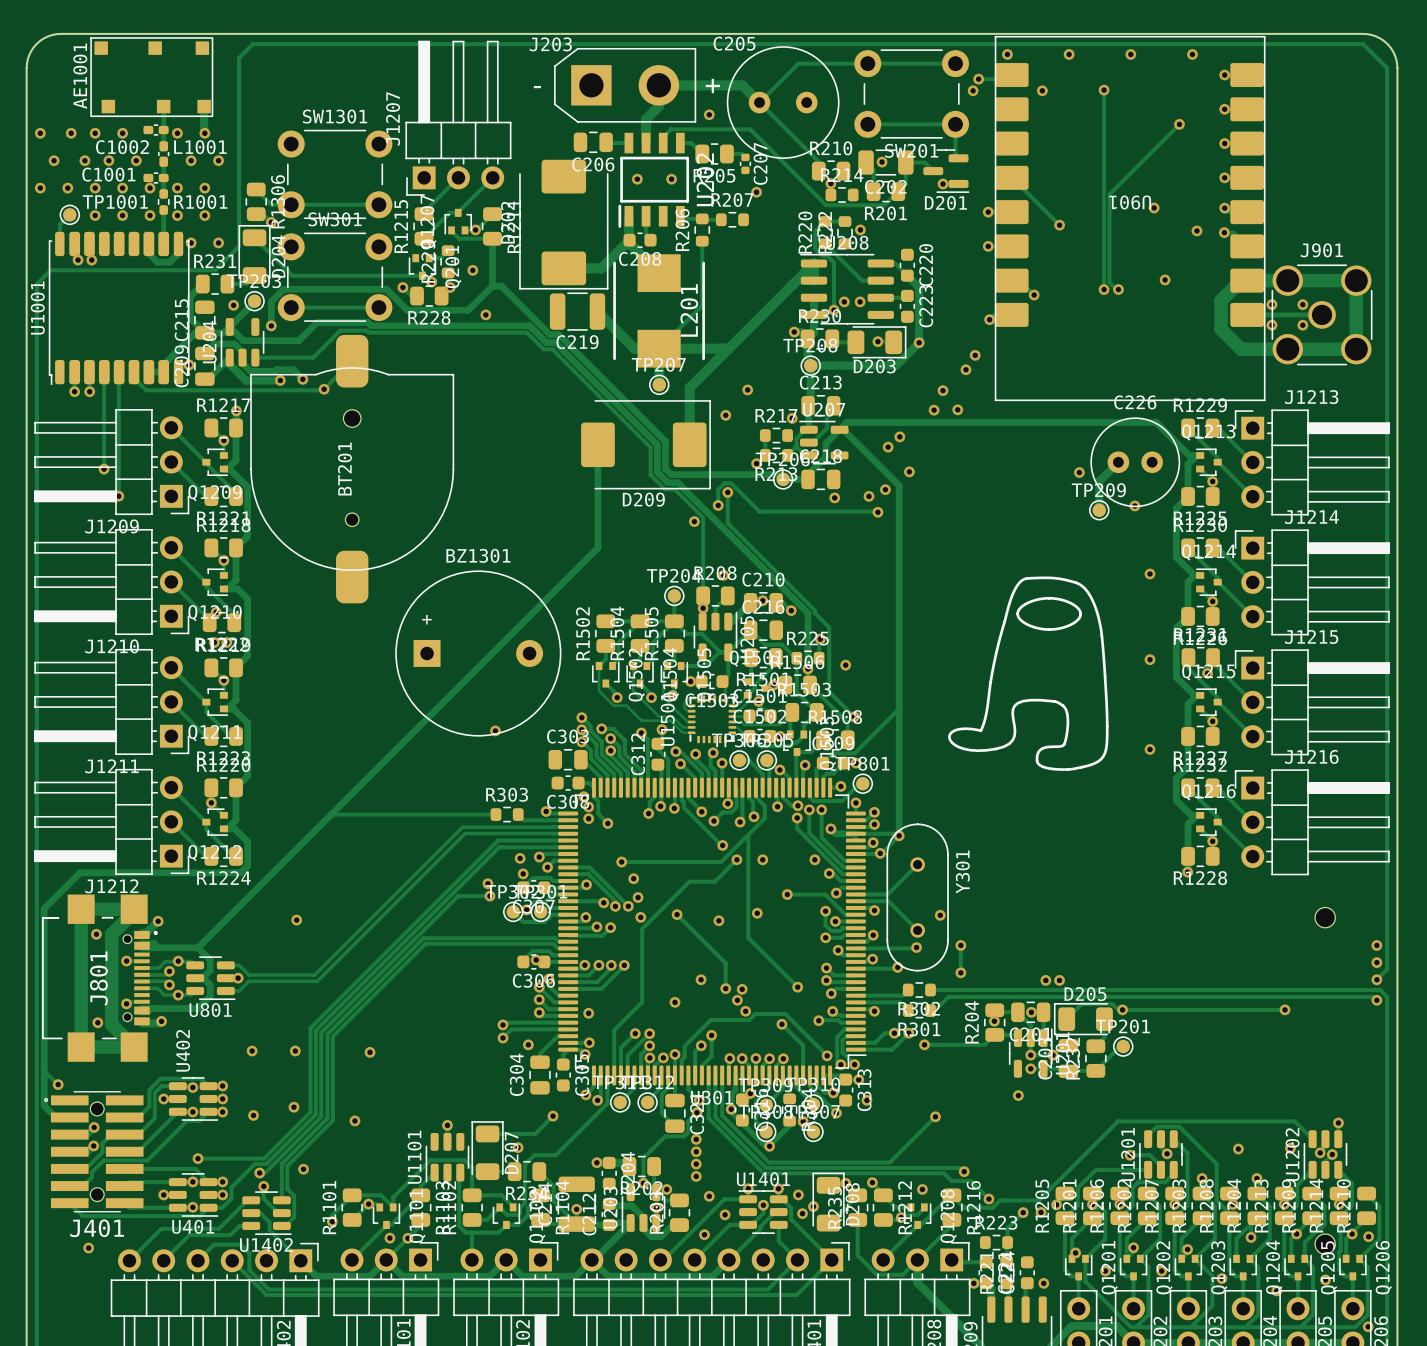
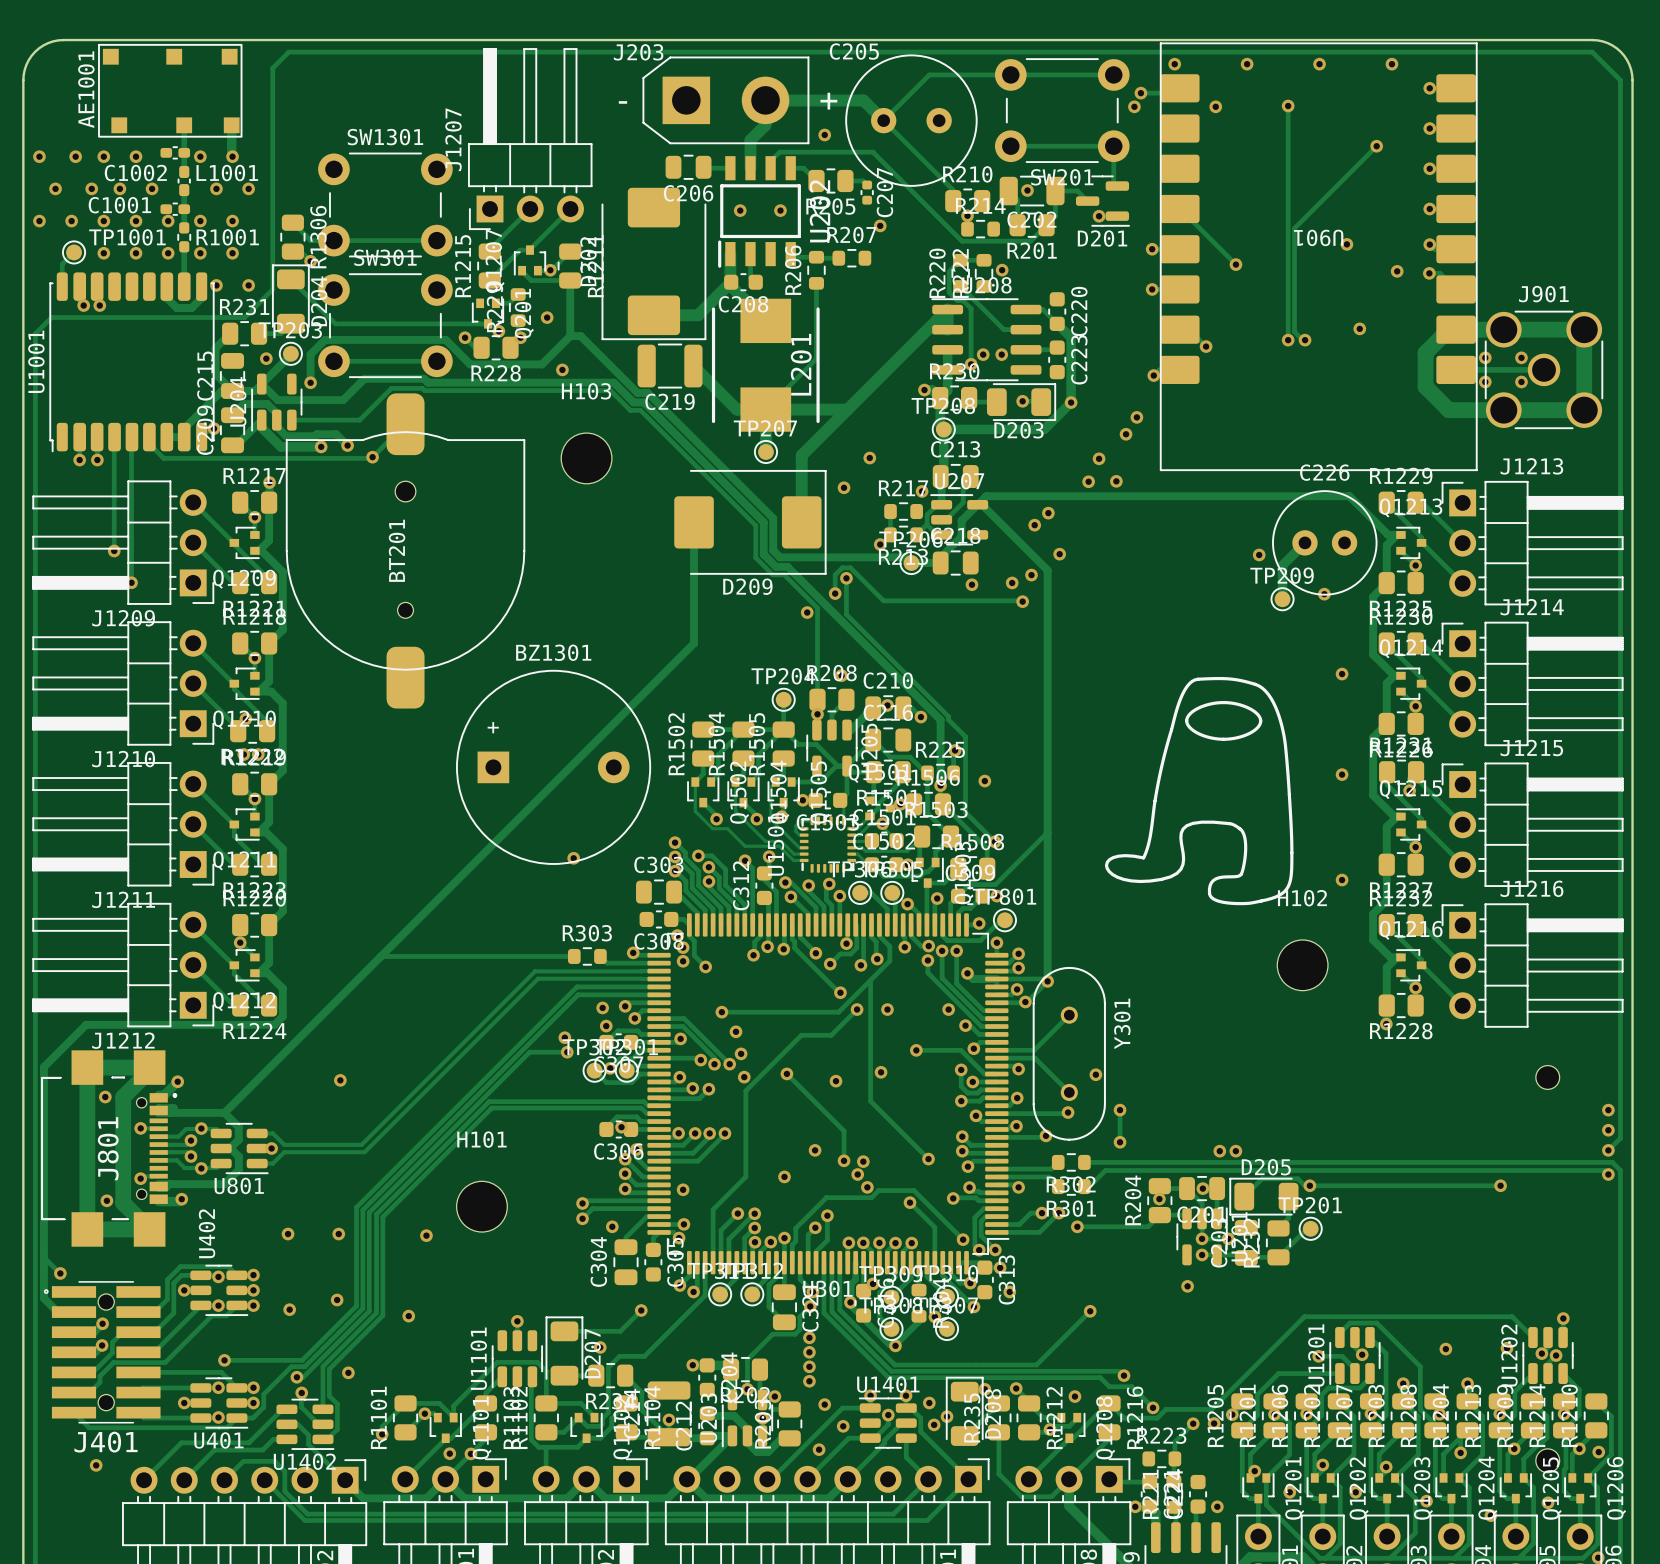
H103: none -> (586, 458)
H102: none -> (1302, 965)
H101: none -> (481, 1206)

